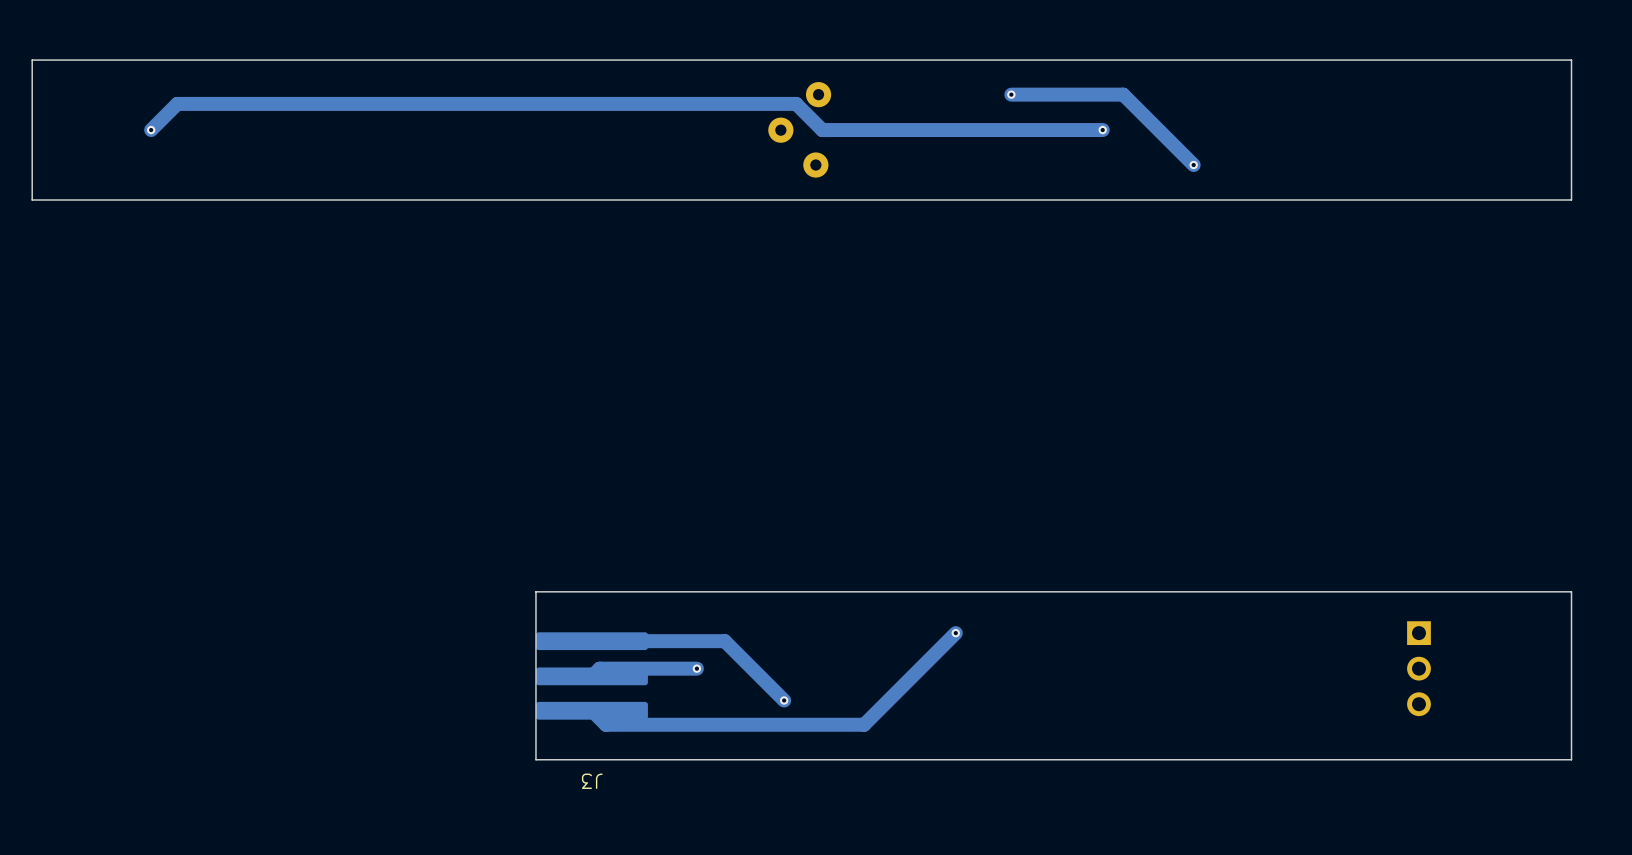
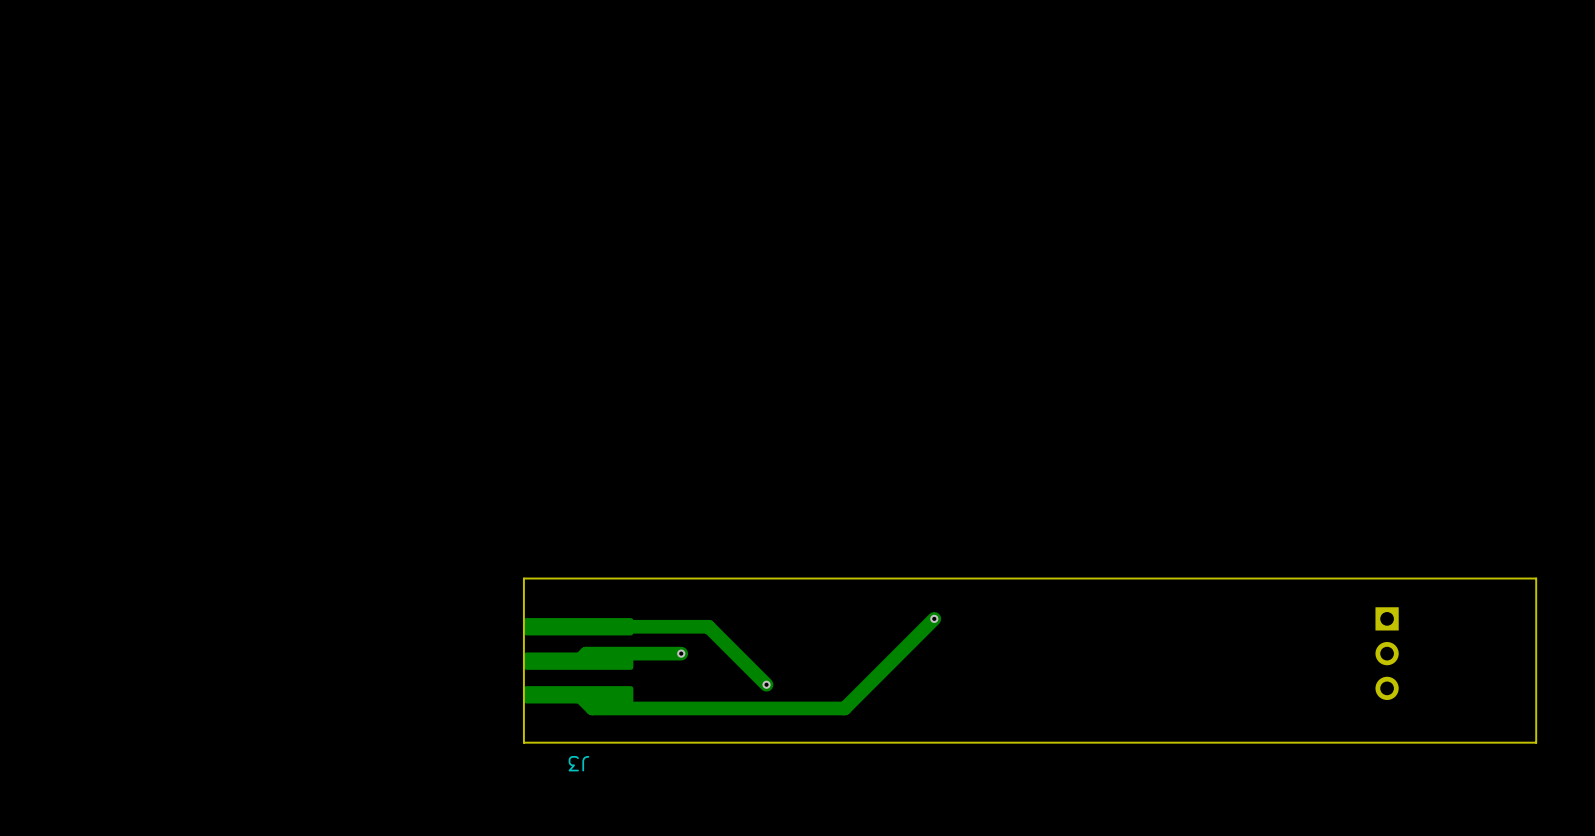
board edge: (1571, 60) (32, 60) (32, 200) (1571, 200) (1571, 60) -> none
track: (1011, 94) (1123, 94) (1193, 165) -> none
via: (1011, 94) -> none
part: (799, 129) -> none
via: (151, 130) -> none
track: (1102, 130) (822, 130) (796, 103) (177, 103) (151, 130) -> none
via: (1102, 130) -> none
via: (1193, 165) -> none

